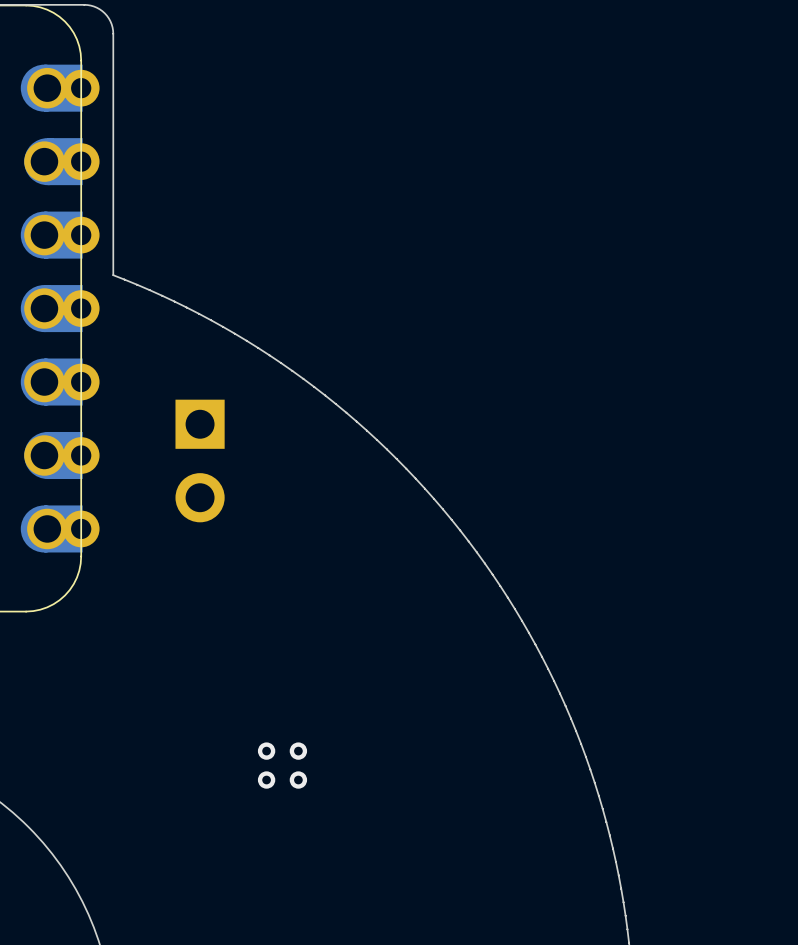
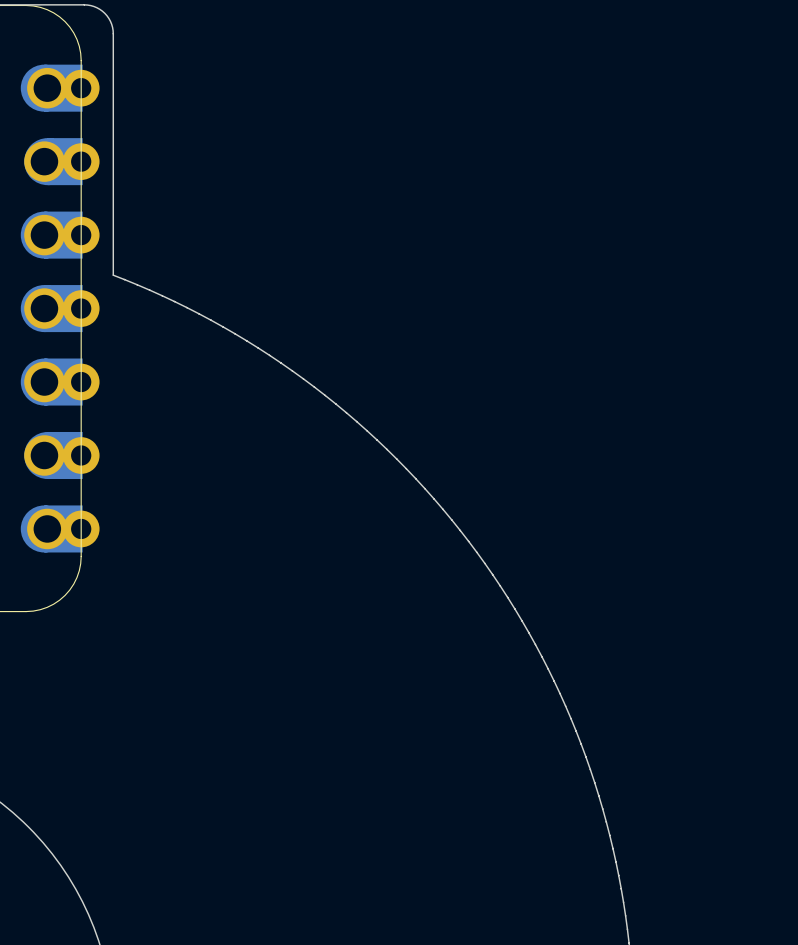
part: (200, 460) -> none
via: (266, 751) -> none
via: (298, 751) -> none
via: (266, 780) -> none
via: (298, 780) -> none

